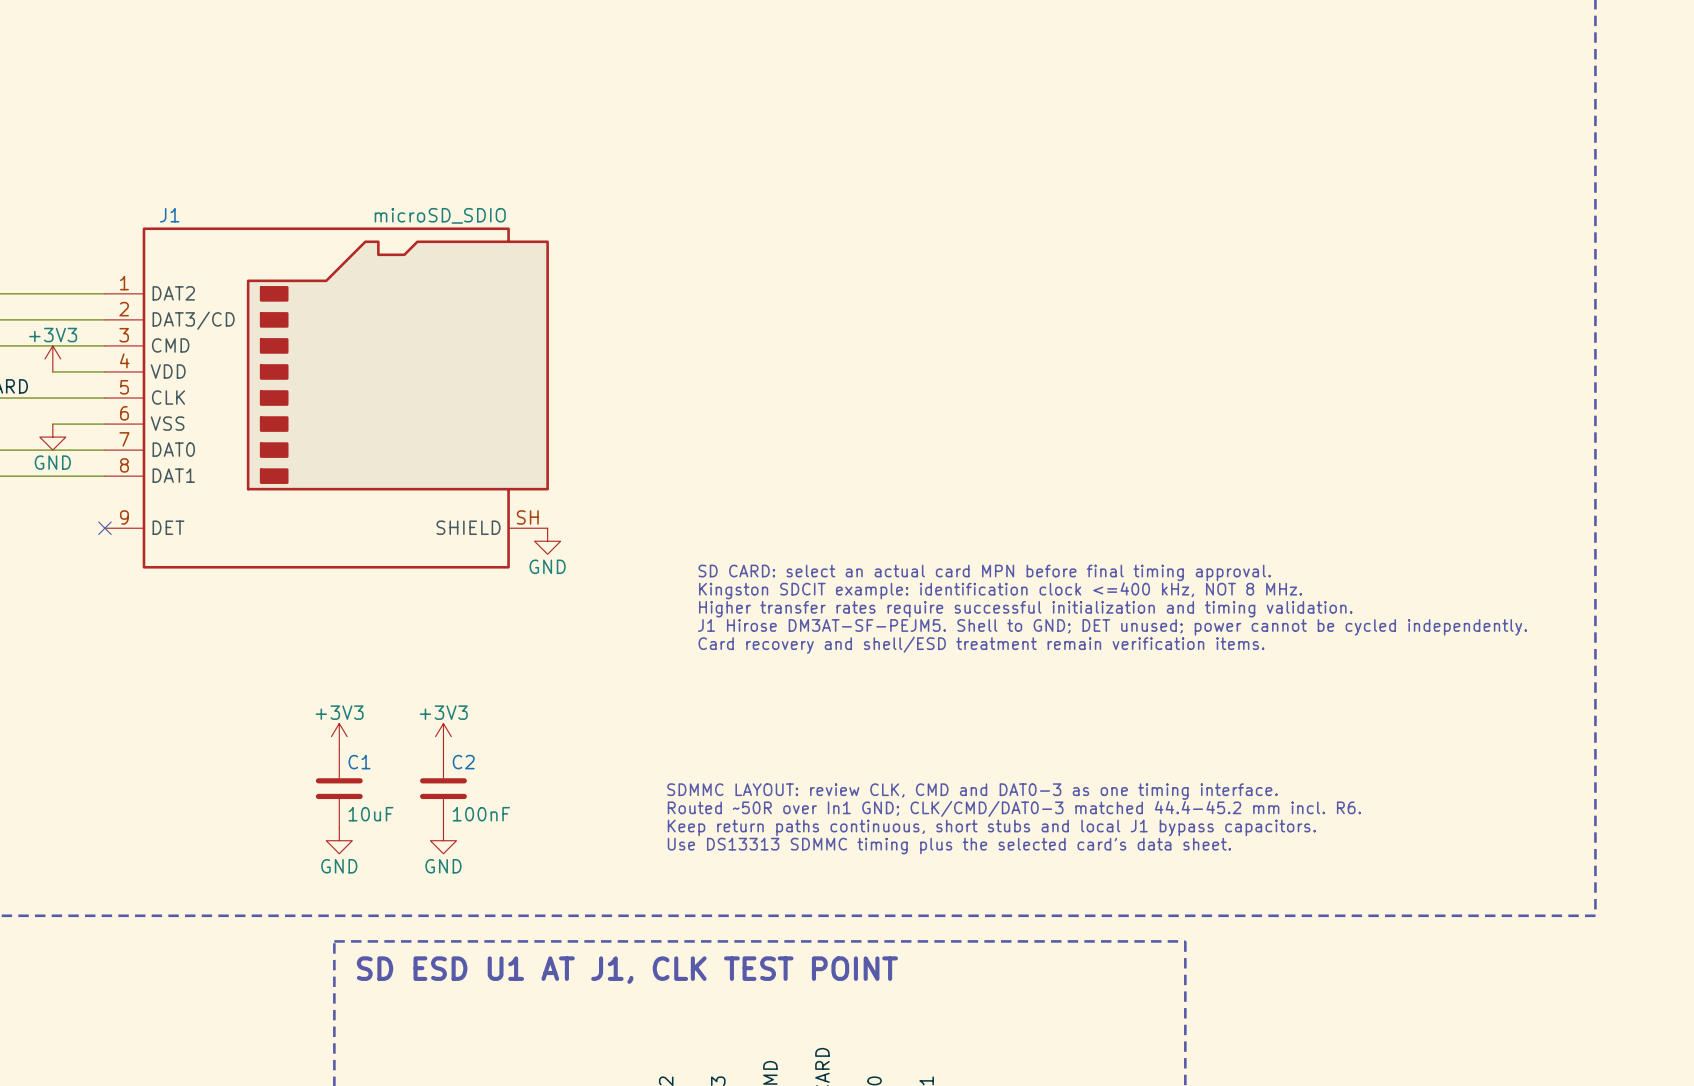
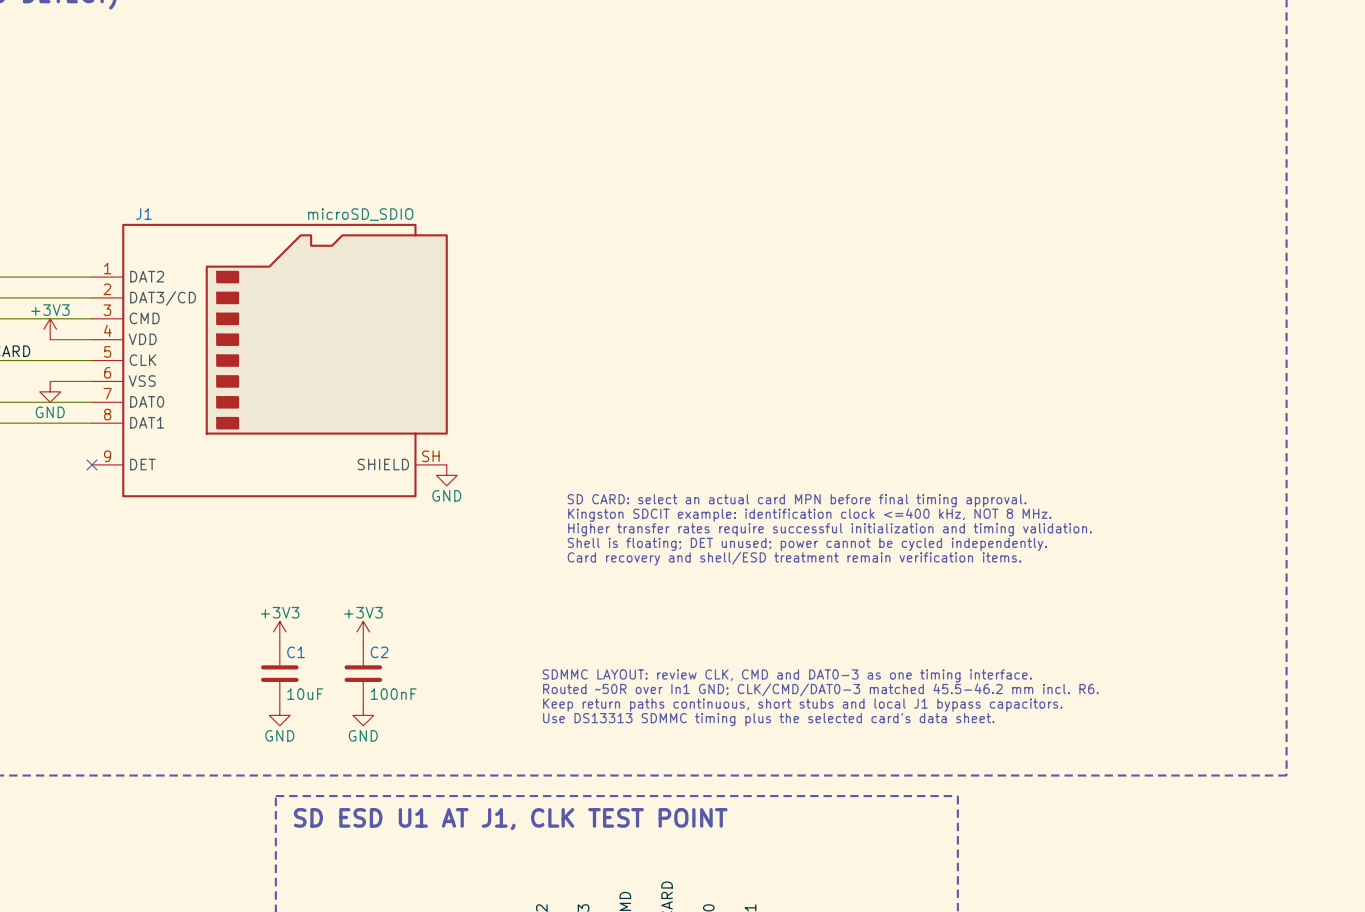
text: J1 Hirose DM3AT-SF-PEJM5. Shell to GND; DET unused; power cannot be cycled independently. (1112, 627) -> Shell is floating; DET unused; power cannot be cycled independently. (807, 544)
text: Routed ~50R over In1 GND; CLK/CMD/DAT0-3 matched 44.4-45.2 mm incl. R6. (1014, 808) -> Routed ~50R over In1 GND; CLK/CMD/DAT0-3 matched 45.5-46.2 mm incl. R6. (820, 689)

